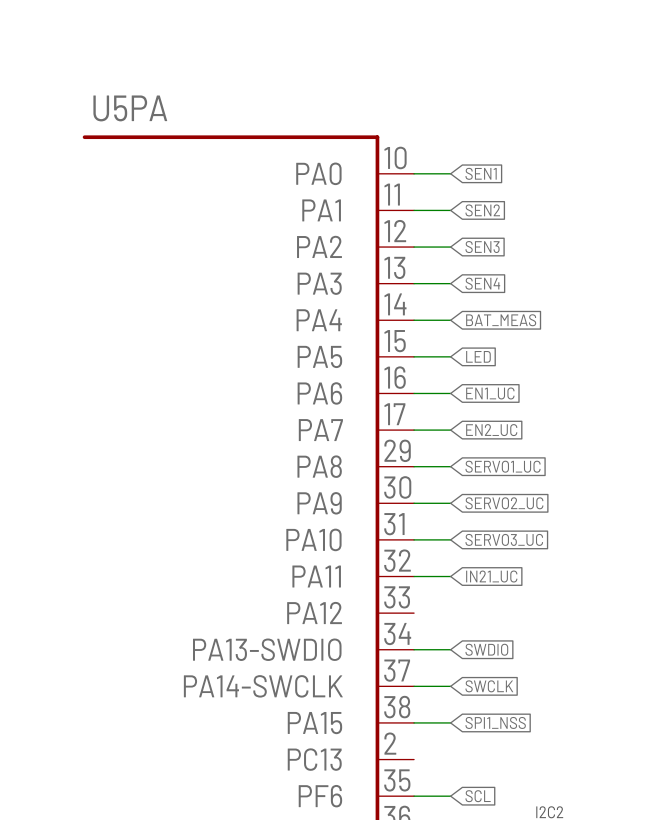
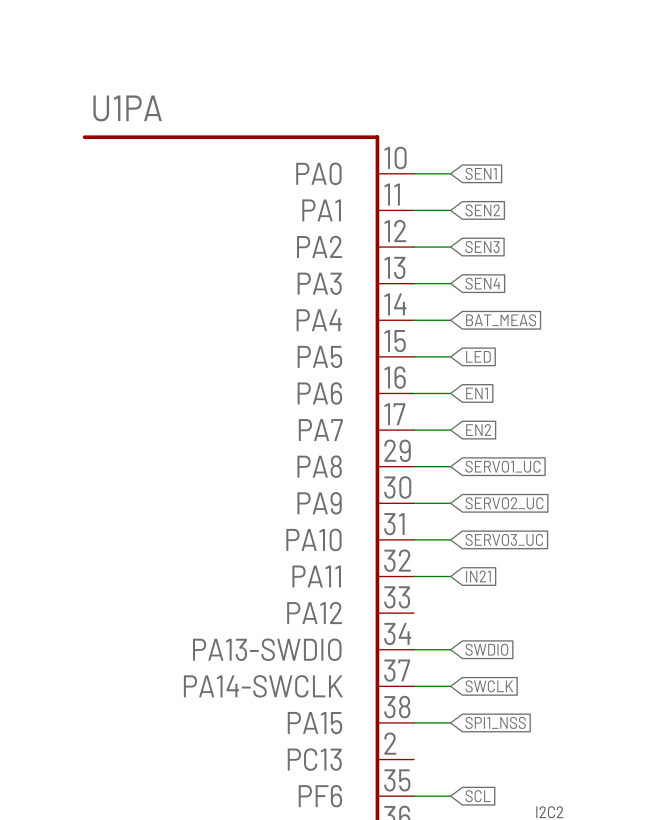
U5PA name: U5PA (130, 108) -> U1PA (127, 108)
global label: EN1_UC (490, 393) -> EN1 (477, 393)
global label: EN2_UC (491, 430) -> EN2 (478, 430)
global label: IN21_UC (491, 576) -> IN21 (478, 576)

